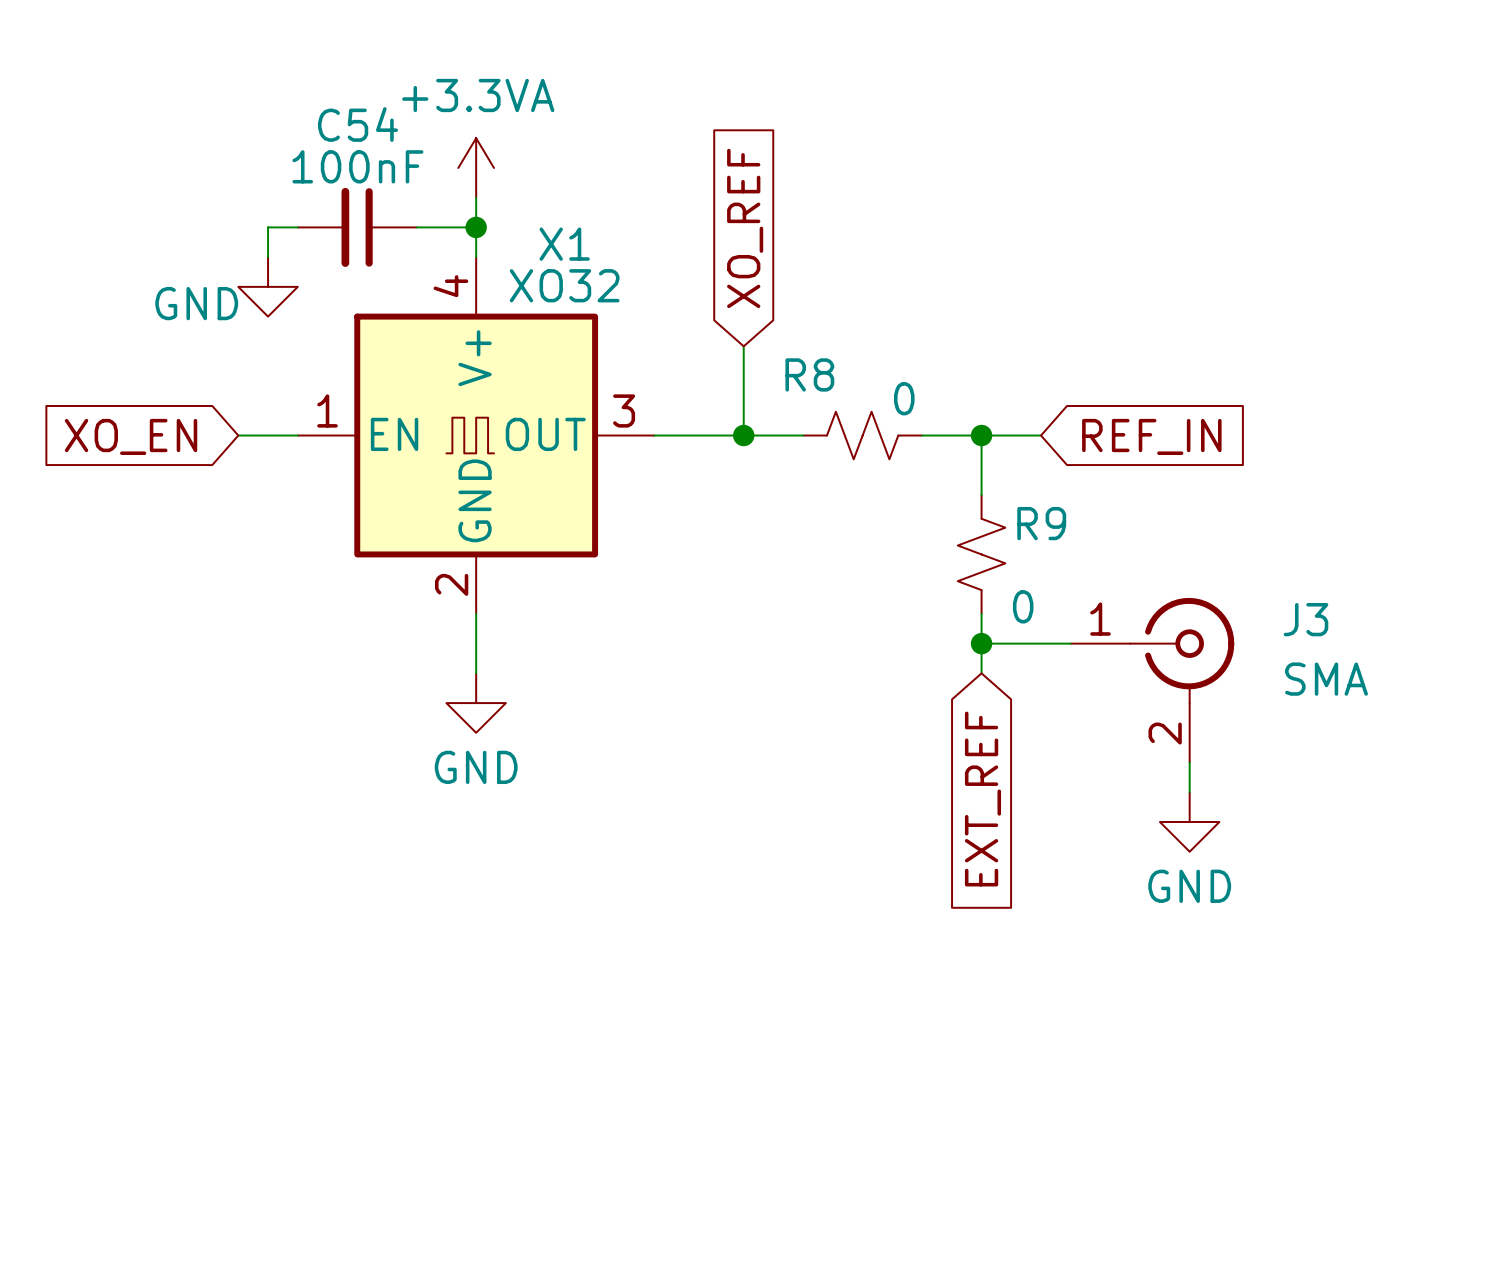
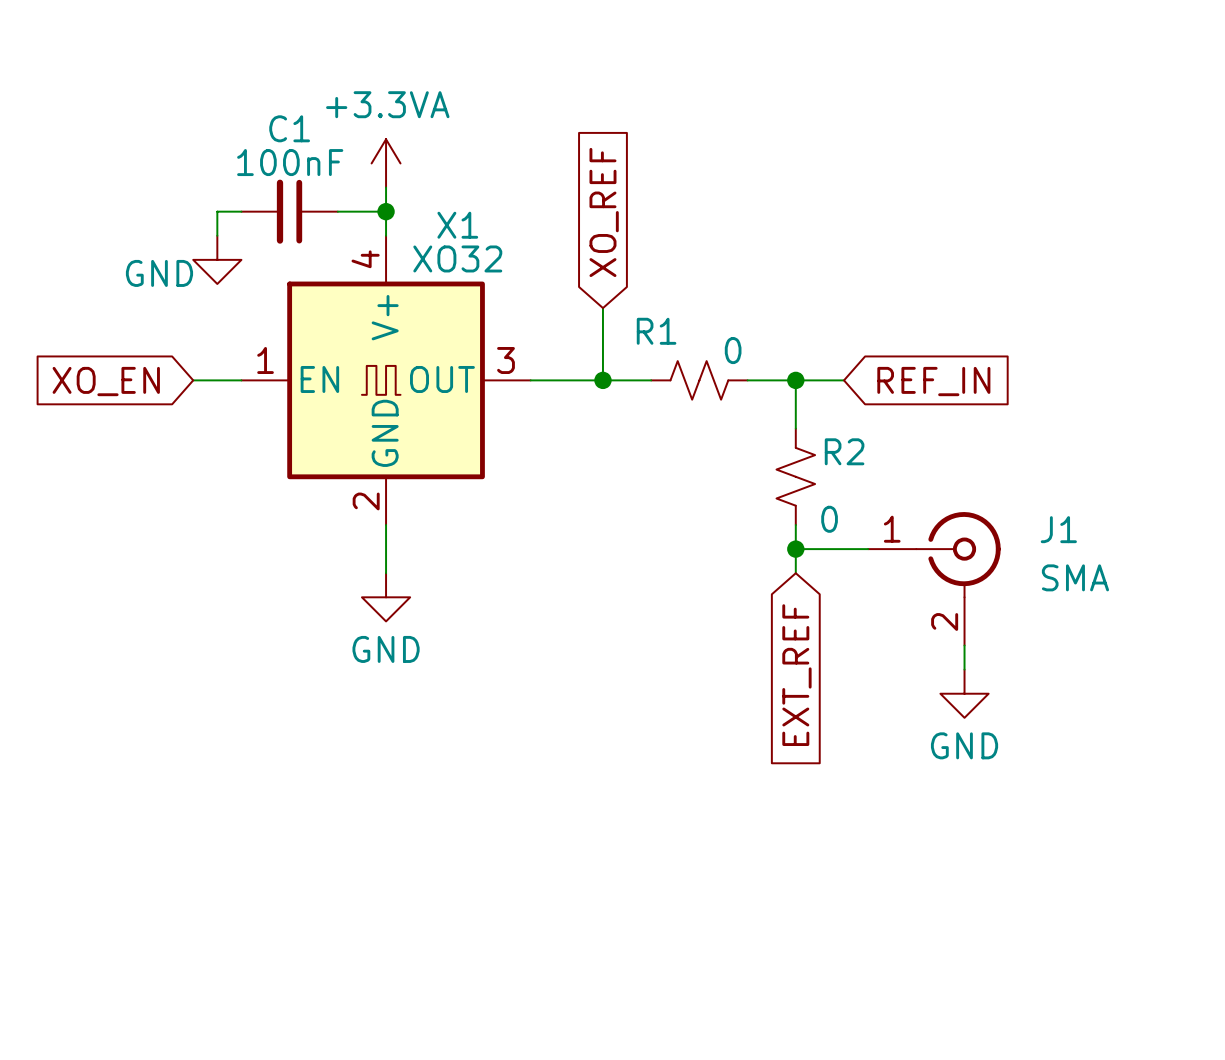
C54 name: C54 (357, 124) -> C1 (289, 128)
R8 name: R8 (809, 374) -> R1 (656, 331)
R9 name: R9 (1041, 523) -> R2 (844, 451)
J3 name: J3 (1305, 619) -> J1 (1058, 529)

